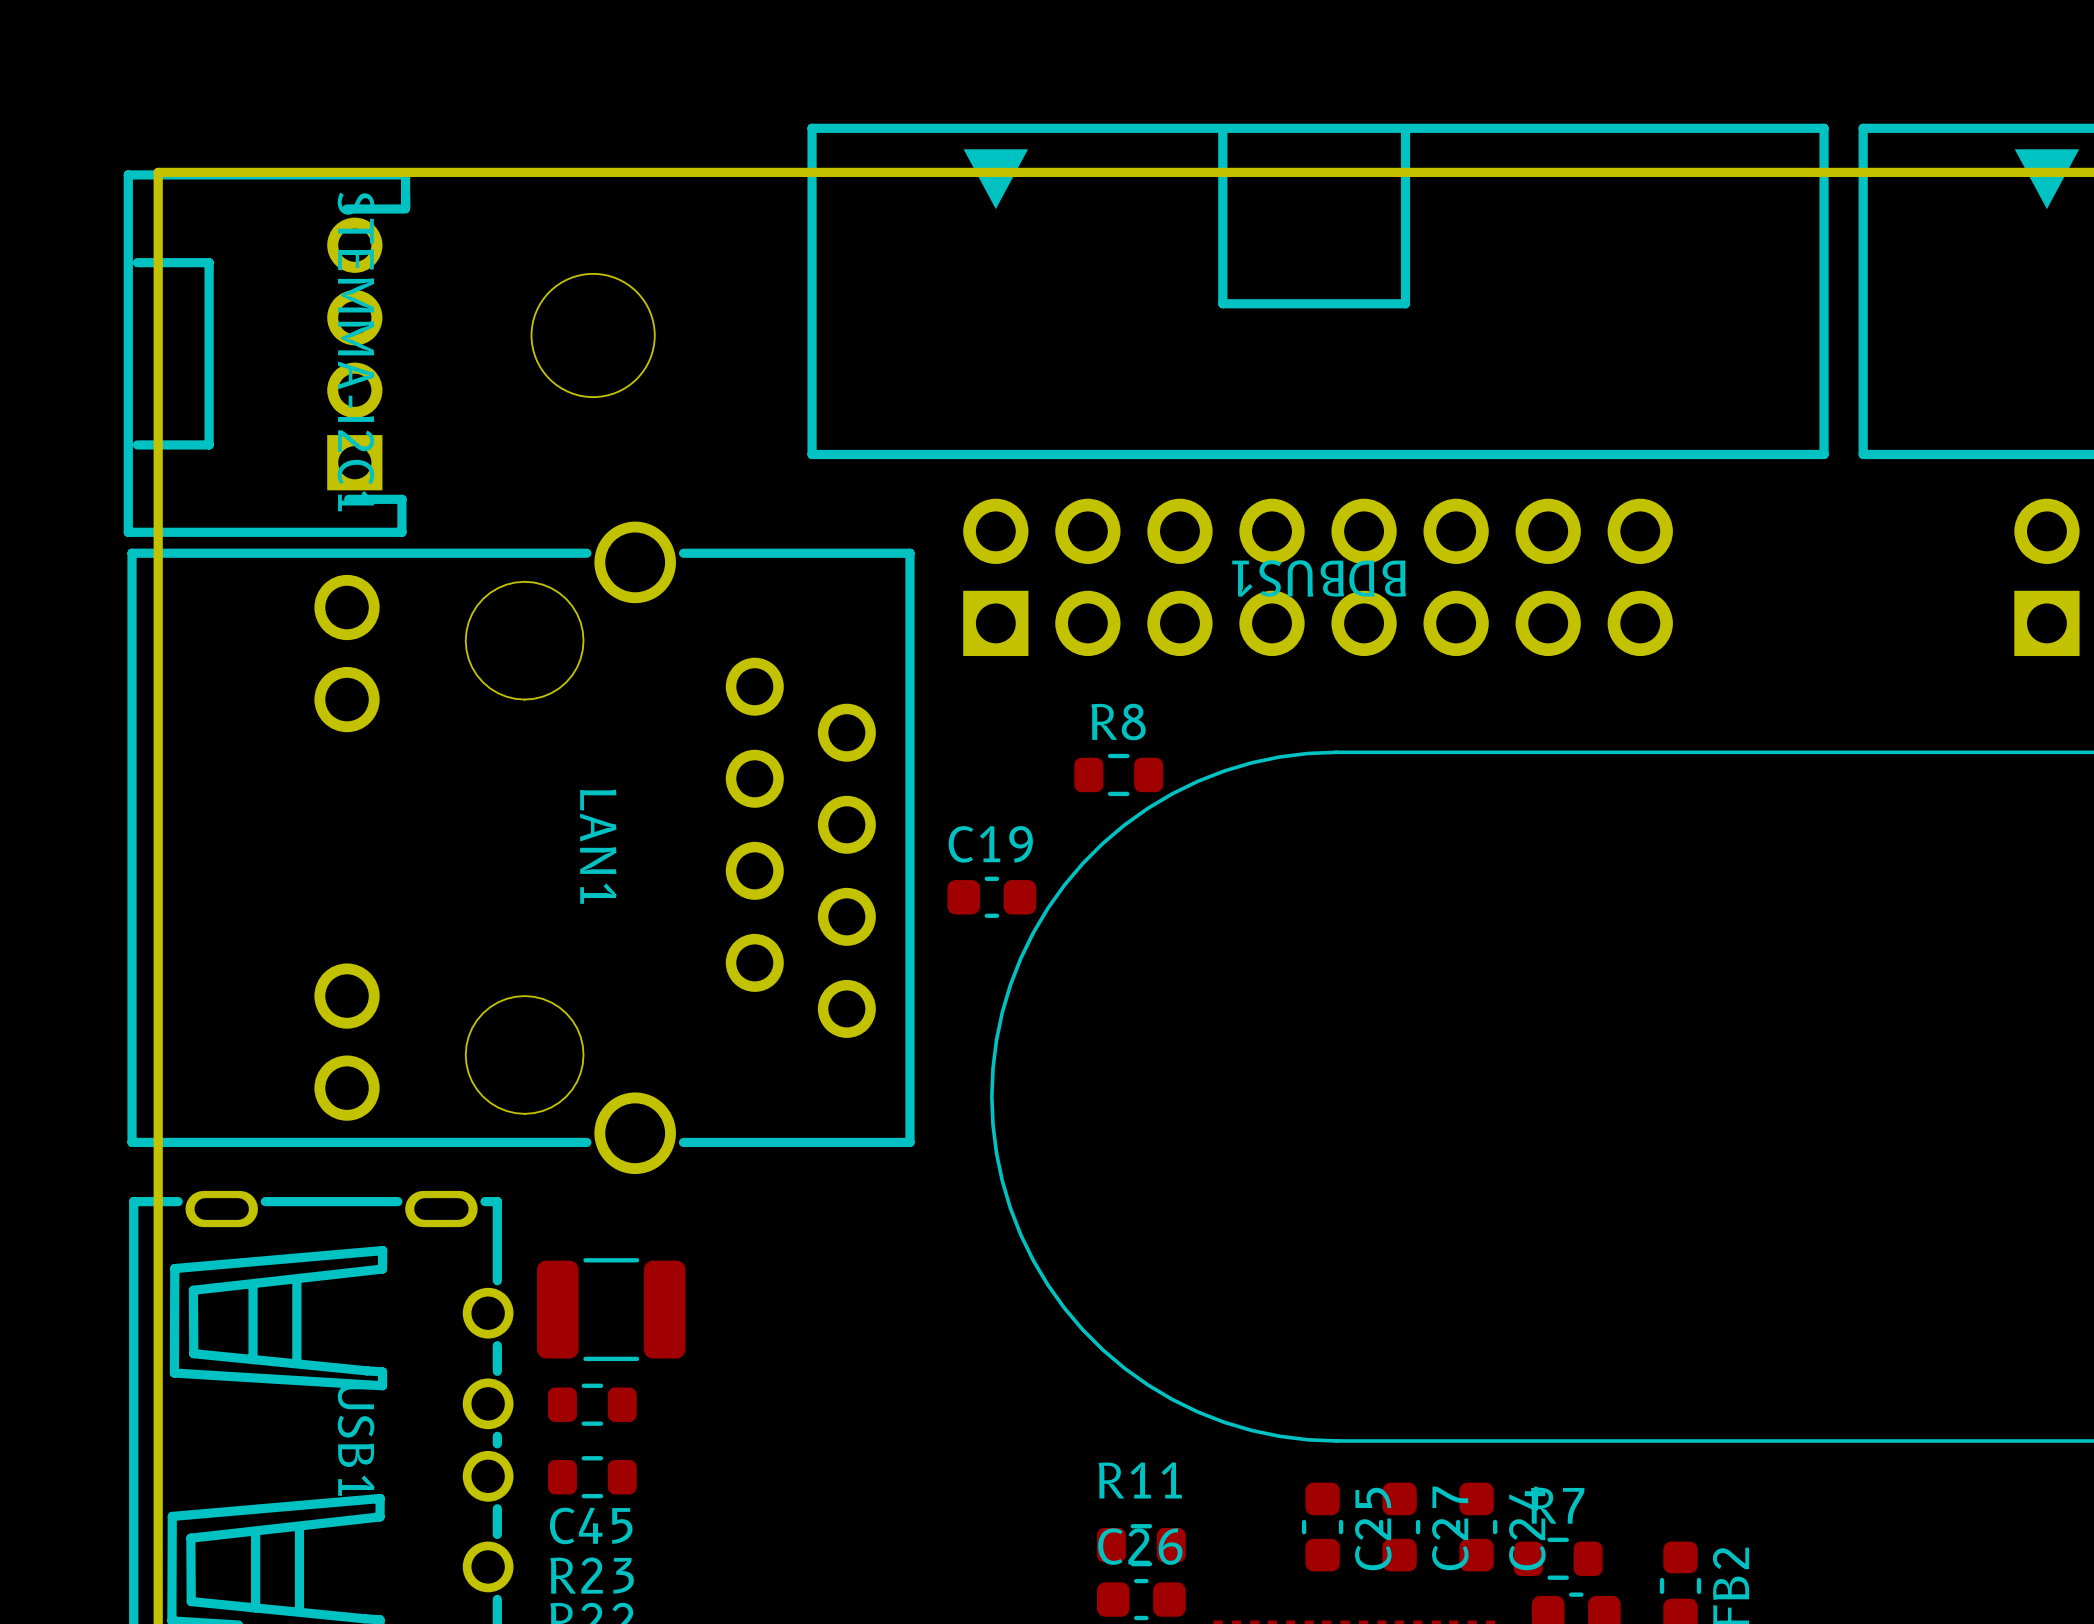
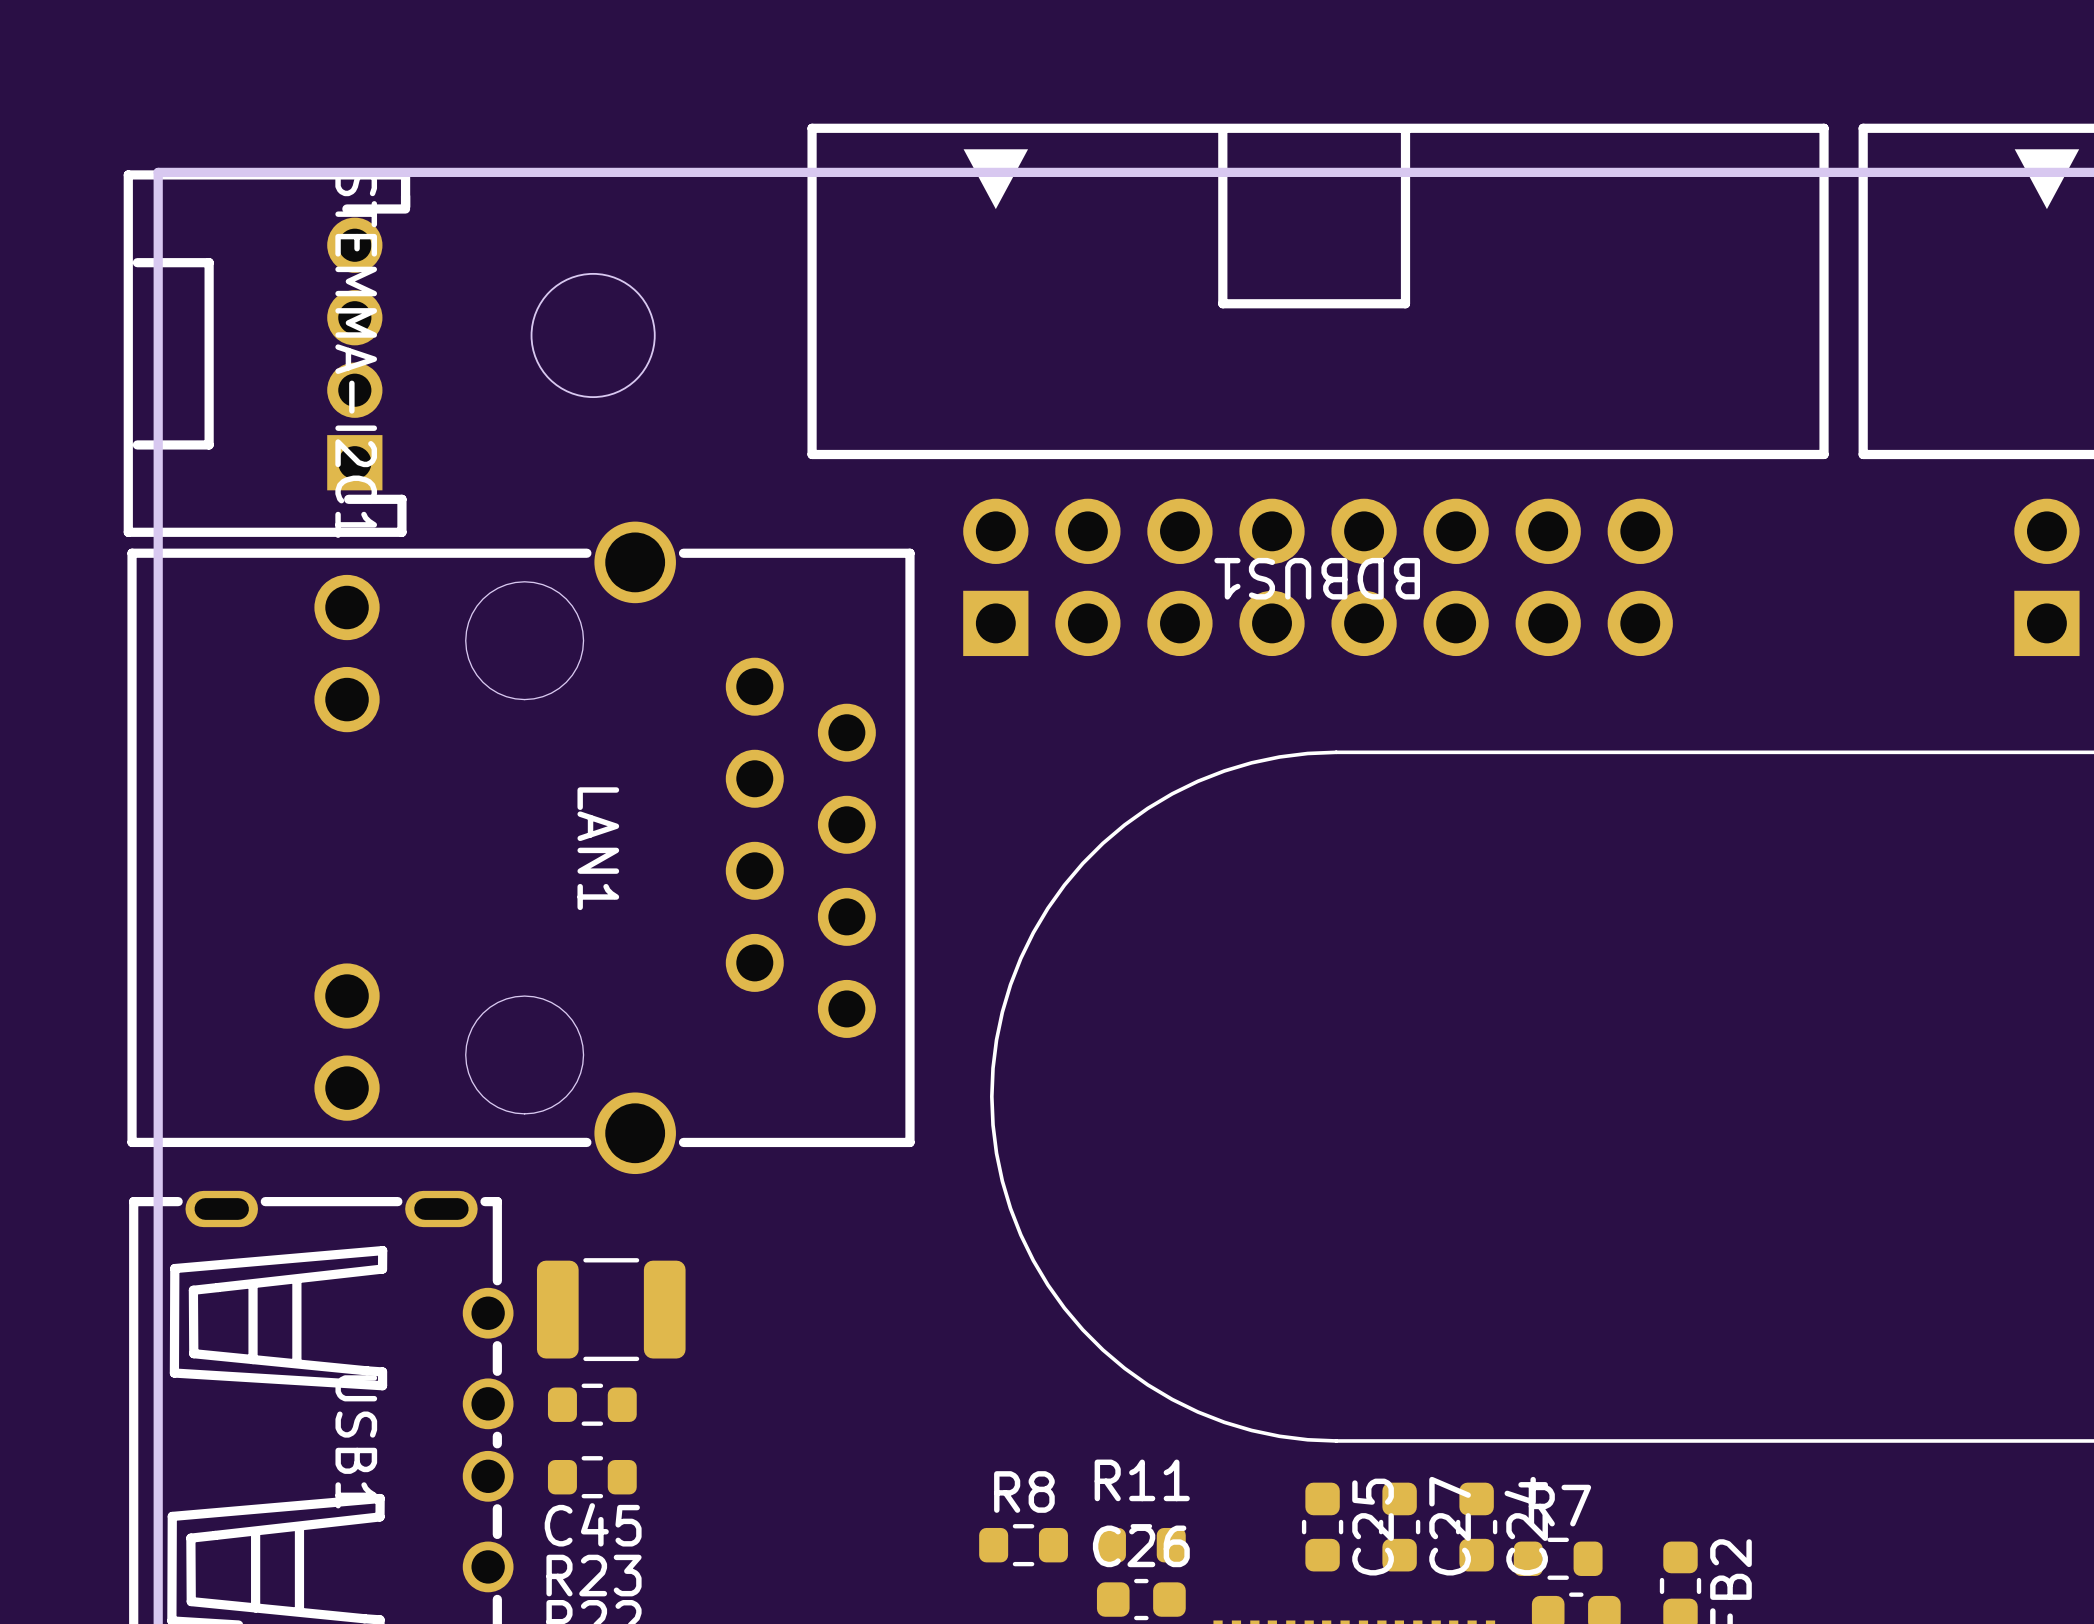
R8 position: (1118, 774) -> (1023, 1545)
C19: (991, 897) -> none

